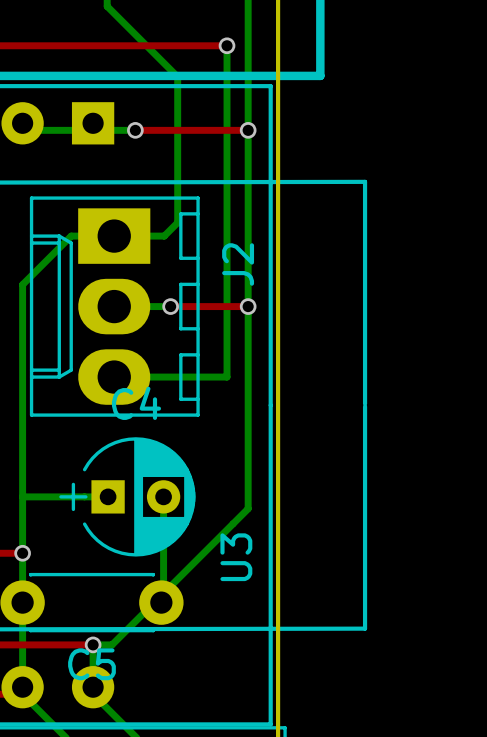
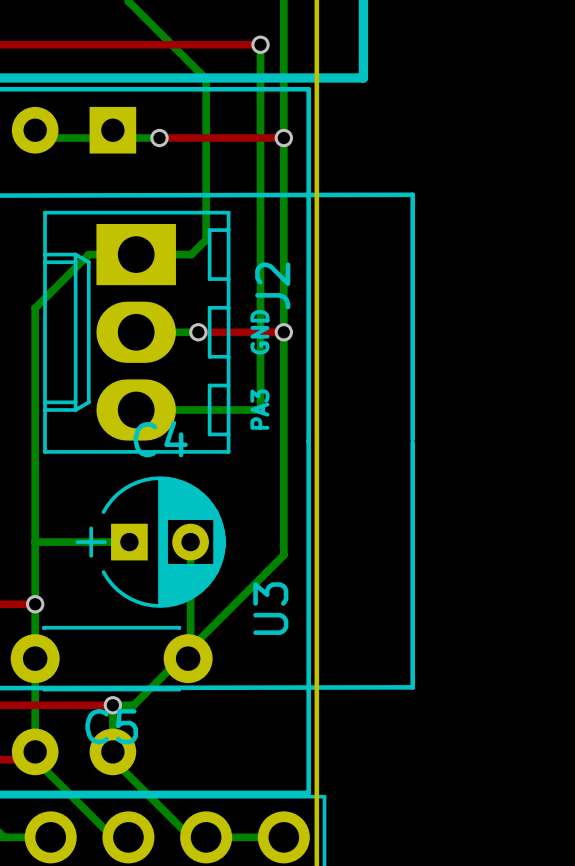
text: none -> GND (259, 332)
text: none -> PA3 (259, 409)

